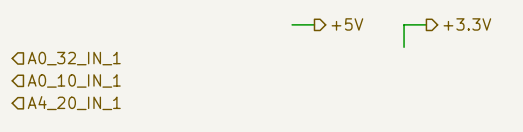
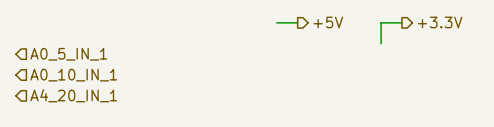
hierarchical label: A0_32_IN_1 (74, 58) -> A0_5_IN_1 (68, 54)

